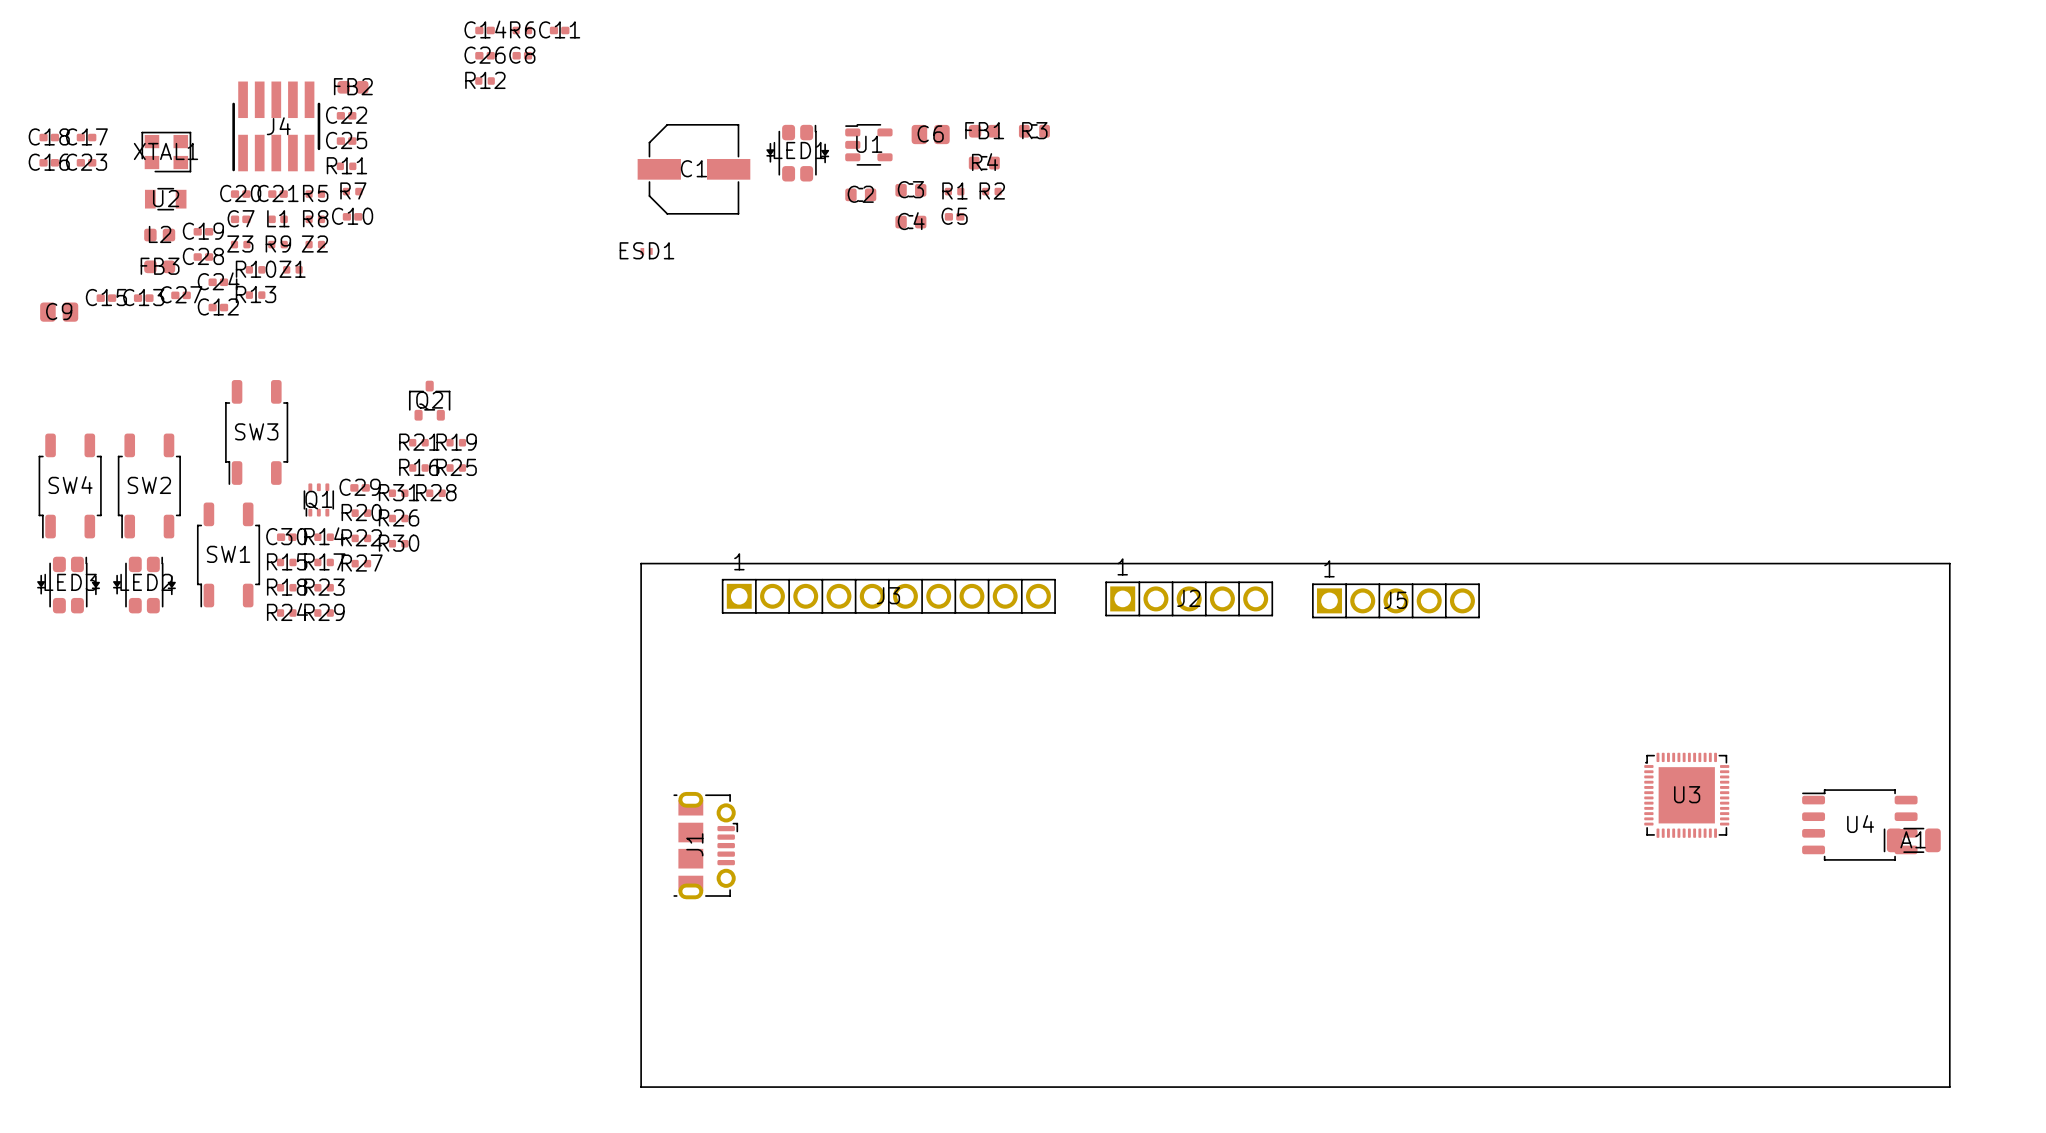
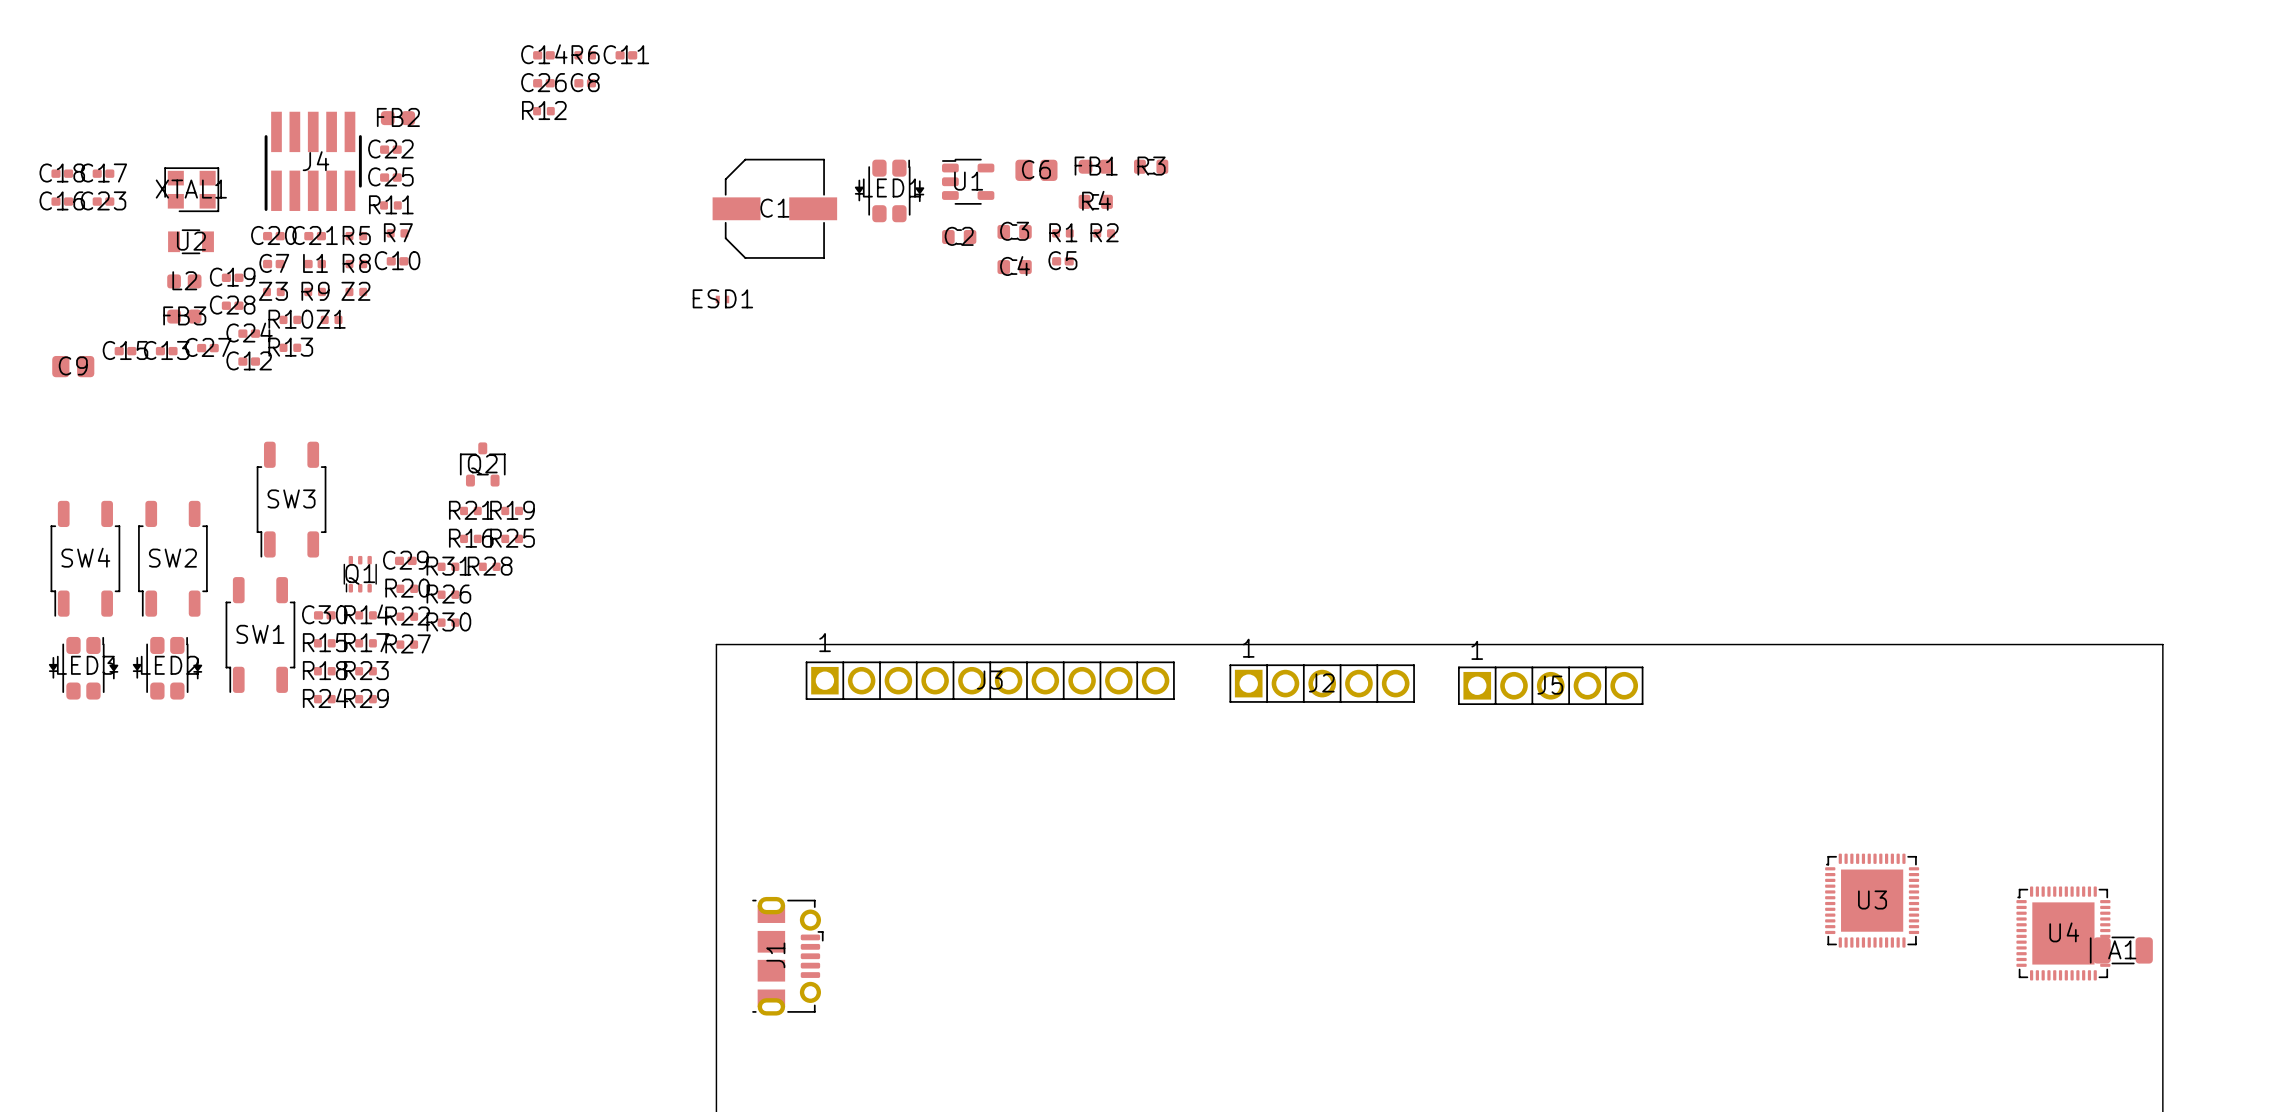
U4 footprint: [1802, 789, 1918, 861] -> [2016, 886, 2111, 981]

